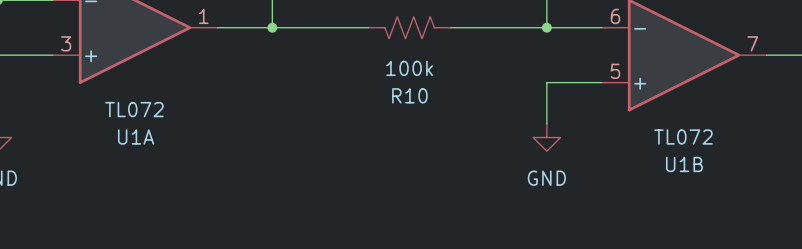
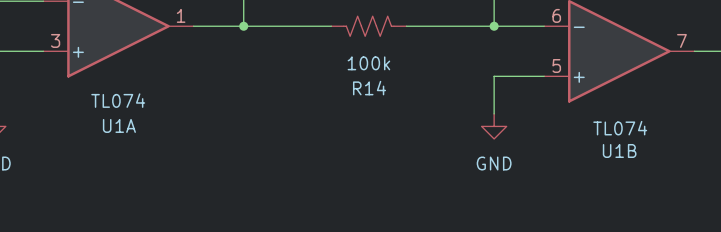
R10 name: R10 (409, 95) -> R14 (369, 88)
U1A value: TL072 (134, 109) -> TL074 (118, 100)
U1B value: TL072 (683, 137) -> TL074 (620, 128)

